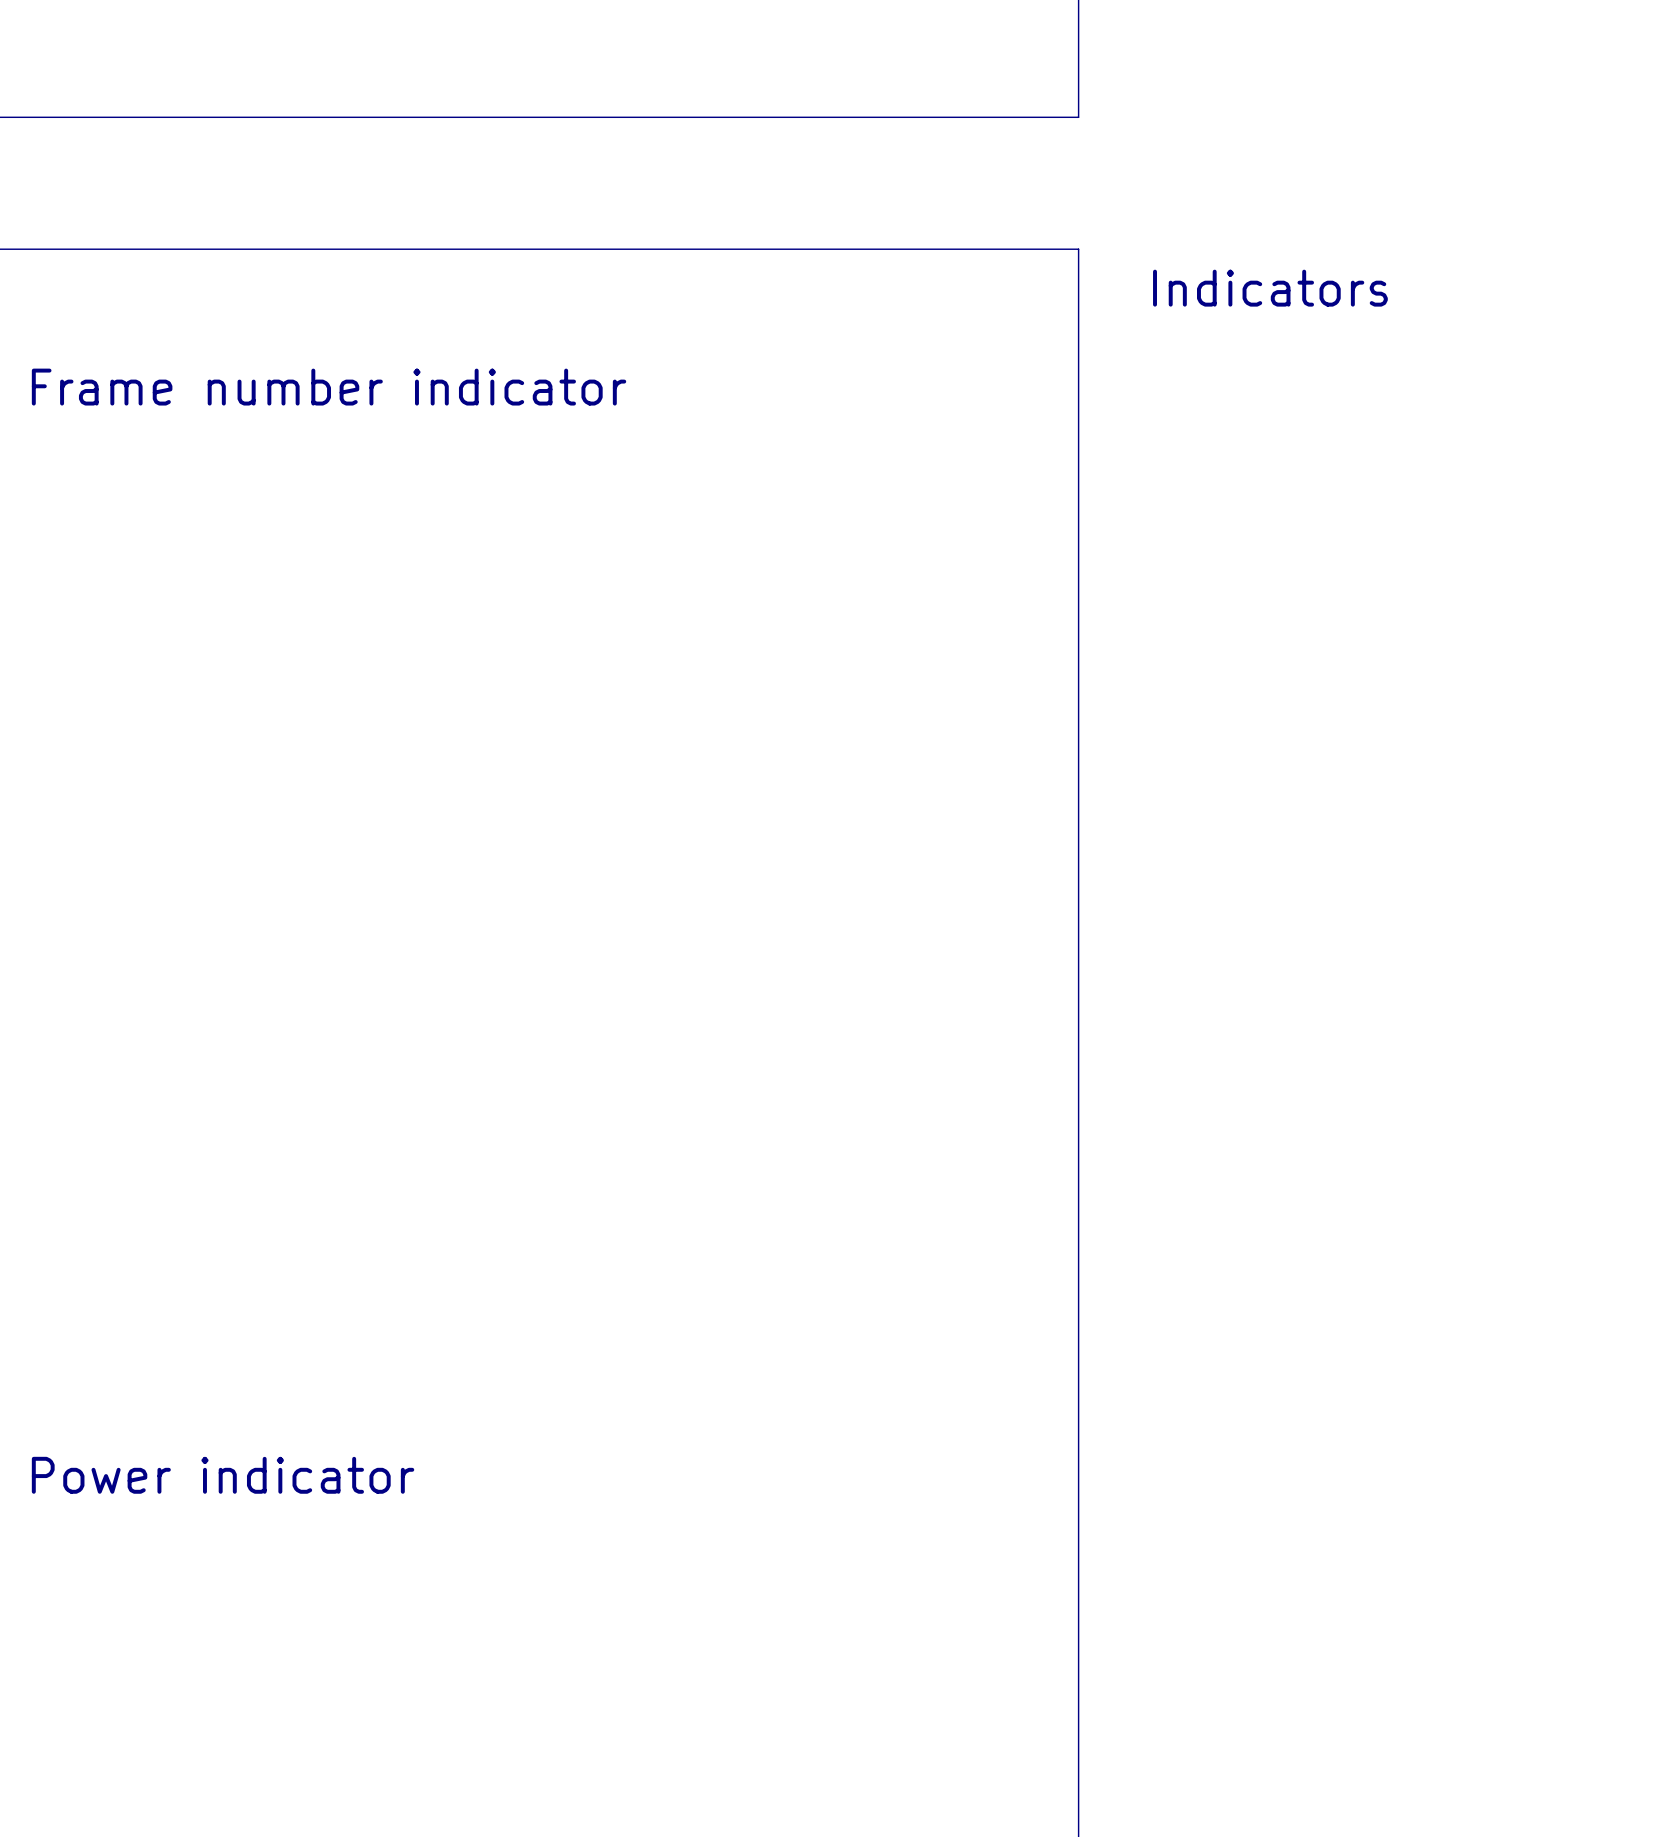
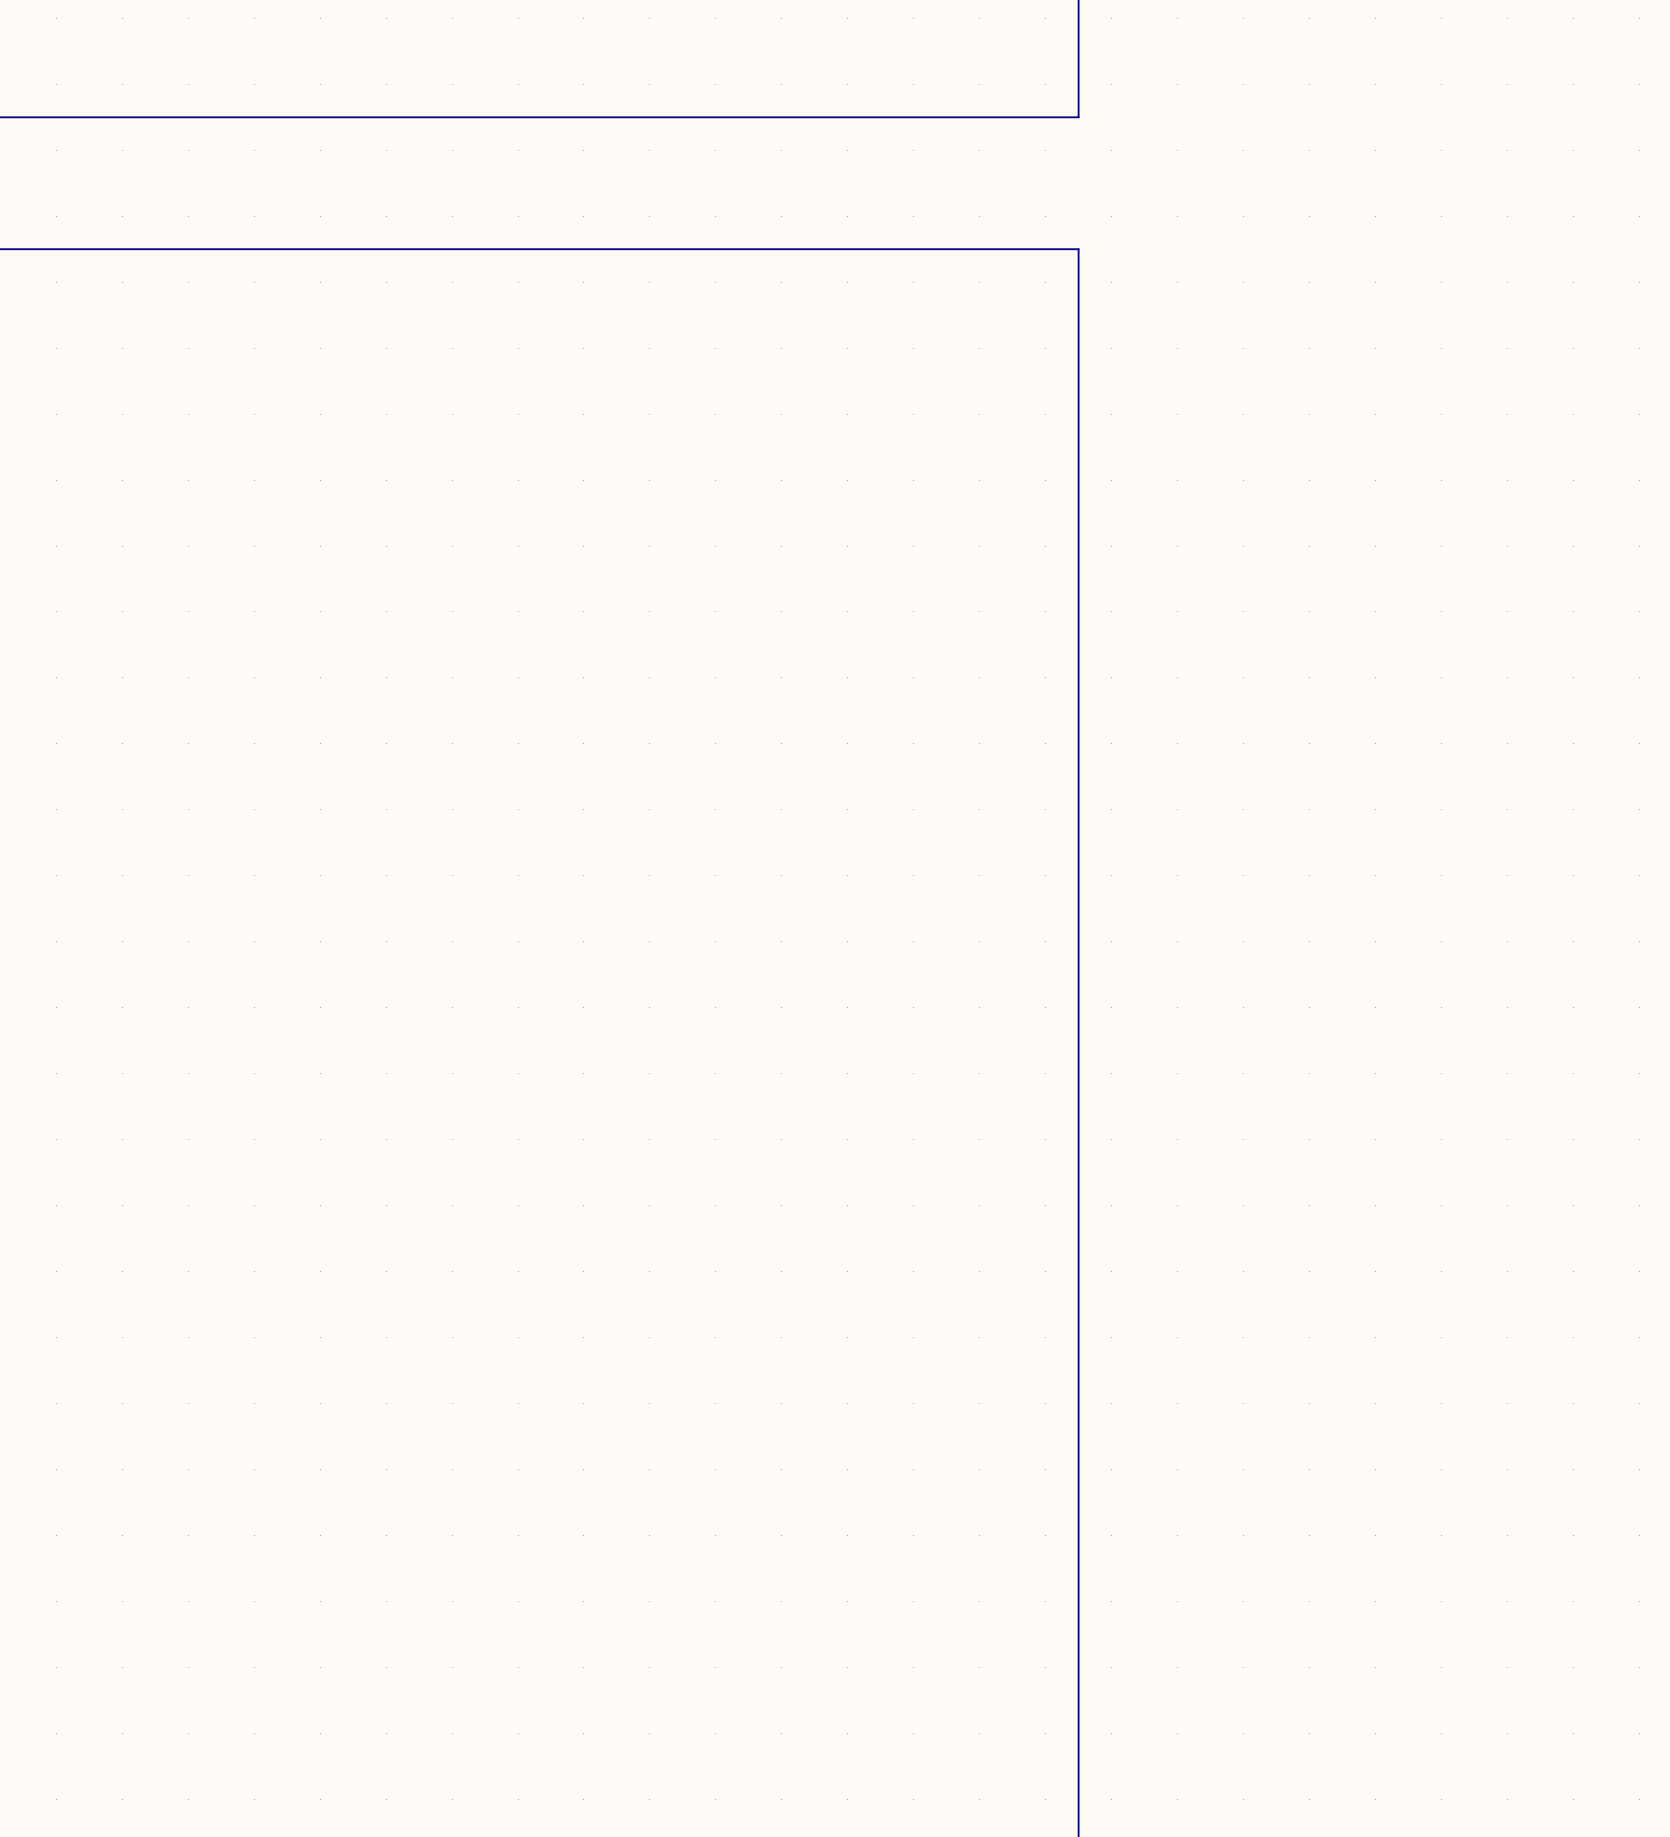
text: Indicators (1270, 288) -> none
text: Frame number indicator (329, 387) -> none
text: Power indicator (223, 1475) -> none

